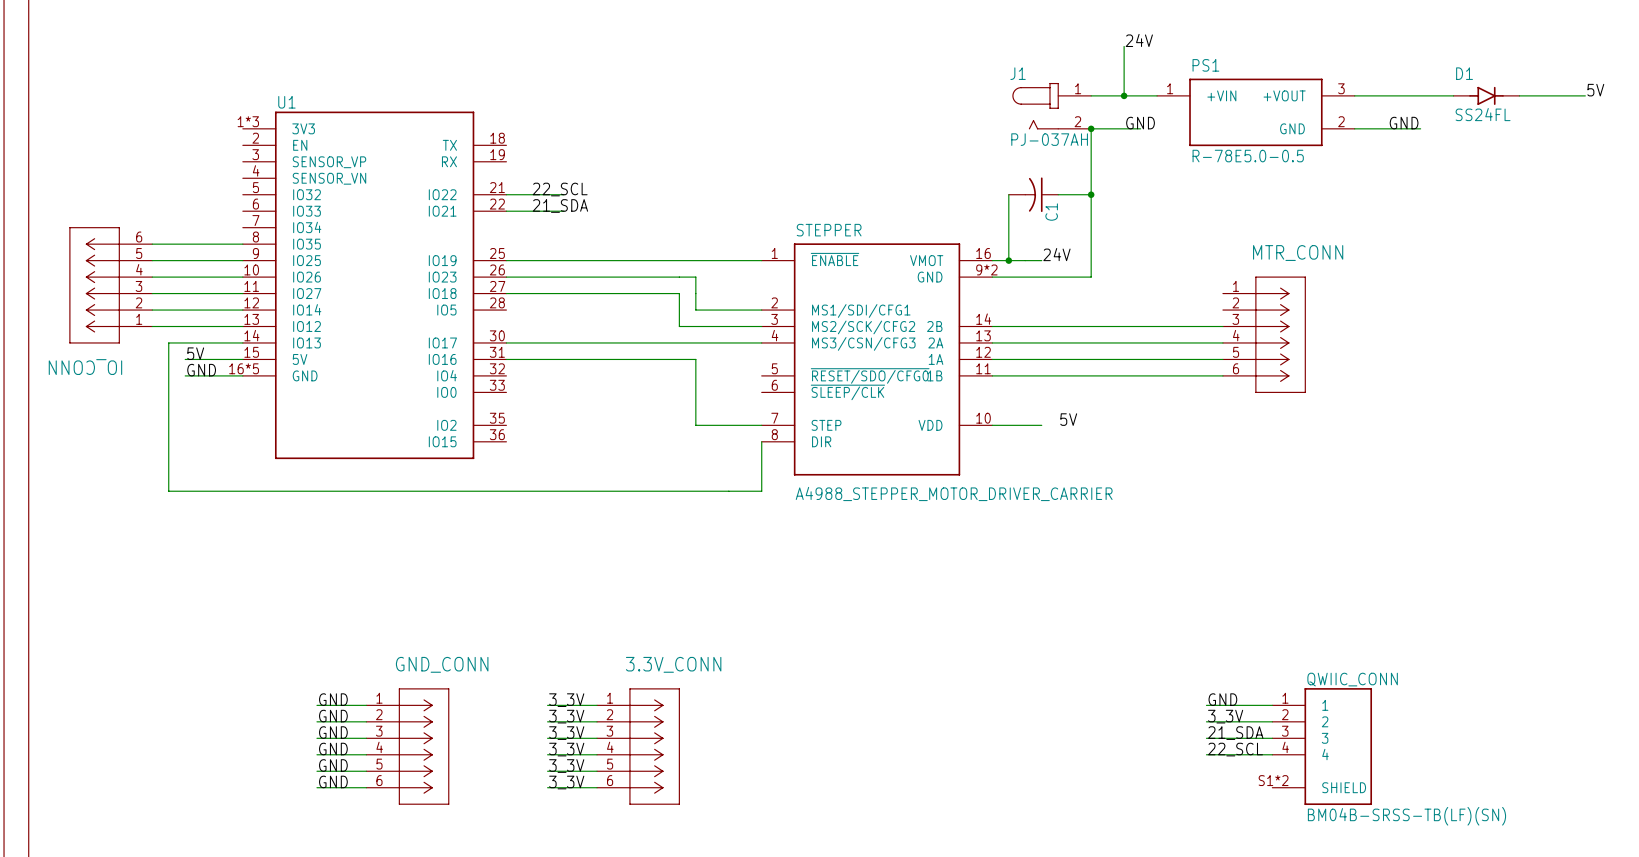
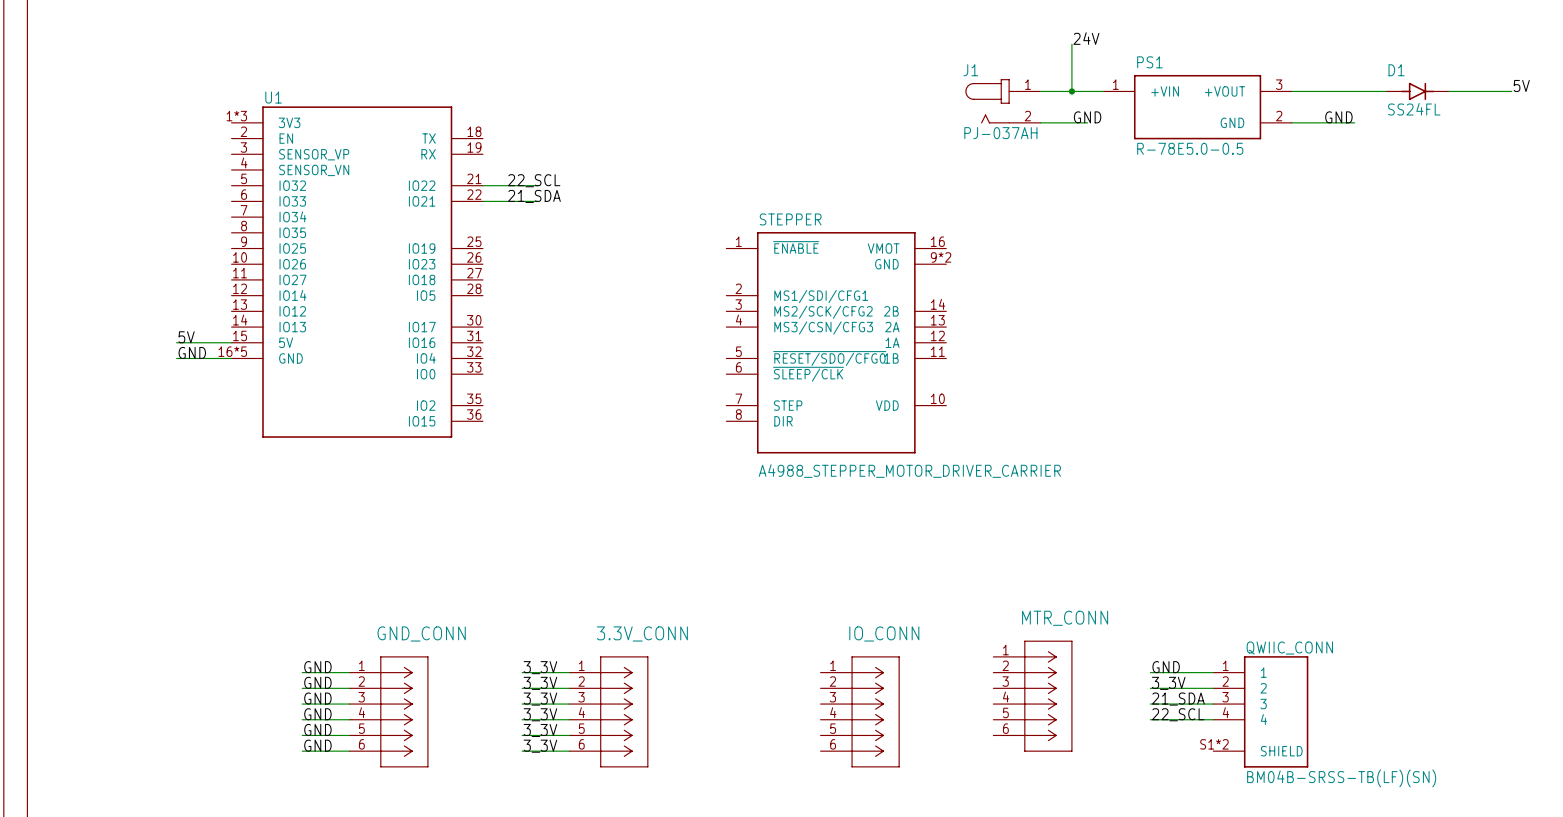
wire: (1091, 128) (1091, 277) (992, 277) -> none
junction: (1091, 128) -> none
wire: (1008, 194) (1008, 260) -> none
C1: (1033, 194) -> none
wire: (1058, 194) (1091, 194) -> none
junction: (1091, 194) -> none
wire: (152, 244) (242, 244) -> none
label: 24V (1056, 254) -> none
wire: (152, 260) (242, 260) -> none
wire: (506, 260) (761, 260) -> none
wire: (992, 260) (1041, 260) -> none
junction: (1008, 260) -> none
wire: (152, 277) (242, 277) -> none
wire: (506, 277) (695, 277) (695, 310) (761, 310) -> none
IO_CONN: (110, 285) -> none
wire: (152, 293) (242, 293) -> none
wire: (506, 293) (679, 293) (679, 326) (761, 326) -> none
wire: (152, 310) (242, 310) -> none
wire: (152, 326) (242, 326) -> none
wire: (992, 326) (1222, 326) -> none
MTR_CONN: (1264, 334) -> none
wire: (242, 342) (168, 342) (168, 491) (761, 491) (761, 441) -> none
wire: (506, 342) (761, 342) -> none
wire: (992, 342) (1222, 342) -> none
wire: (506, 359) (695, 359) (695, 425) (761, 425) -> none
wire: (992, 359) (1222, 359) -> none
wire: (992, 375) (1222, 375) -> none
label: 5V (1068, 419) -> none
wire: (992, 425) (1041, 425) -> none
MTR_CONN: none -> (1032, 696)
IO_CONN: none -> (860, 711)

